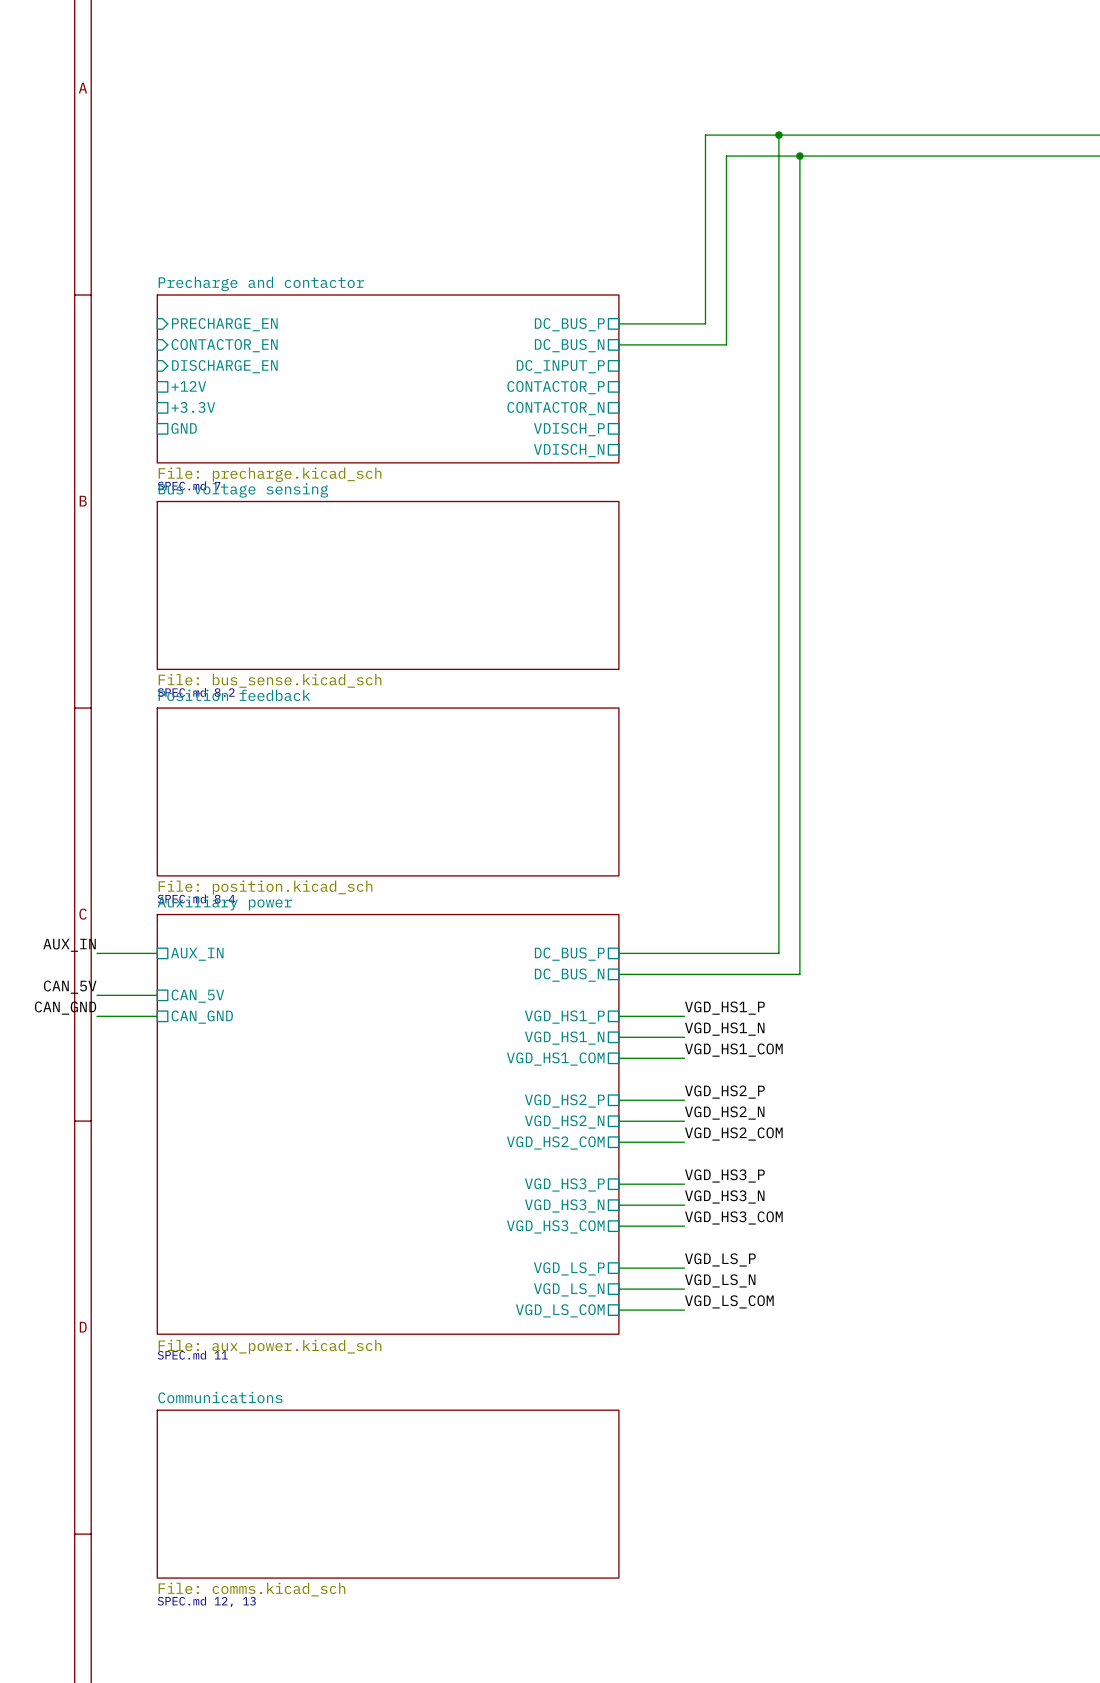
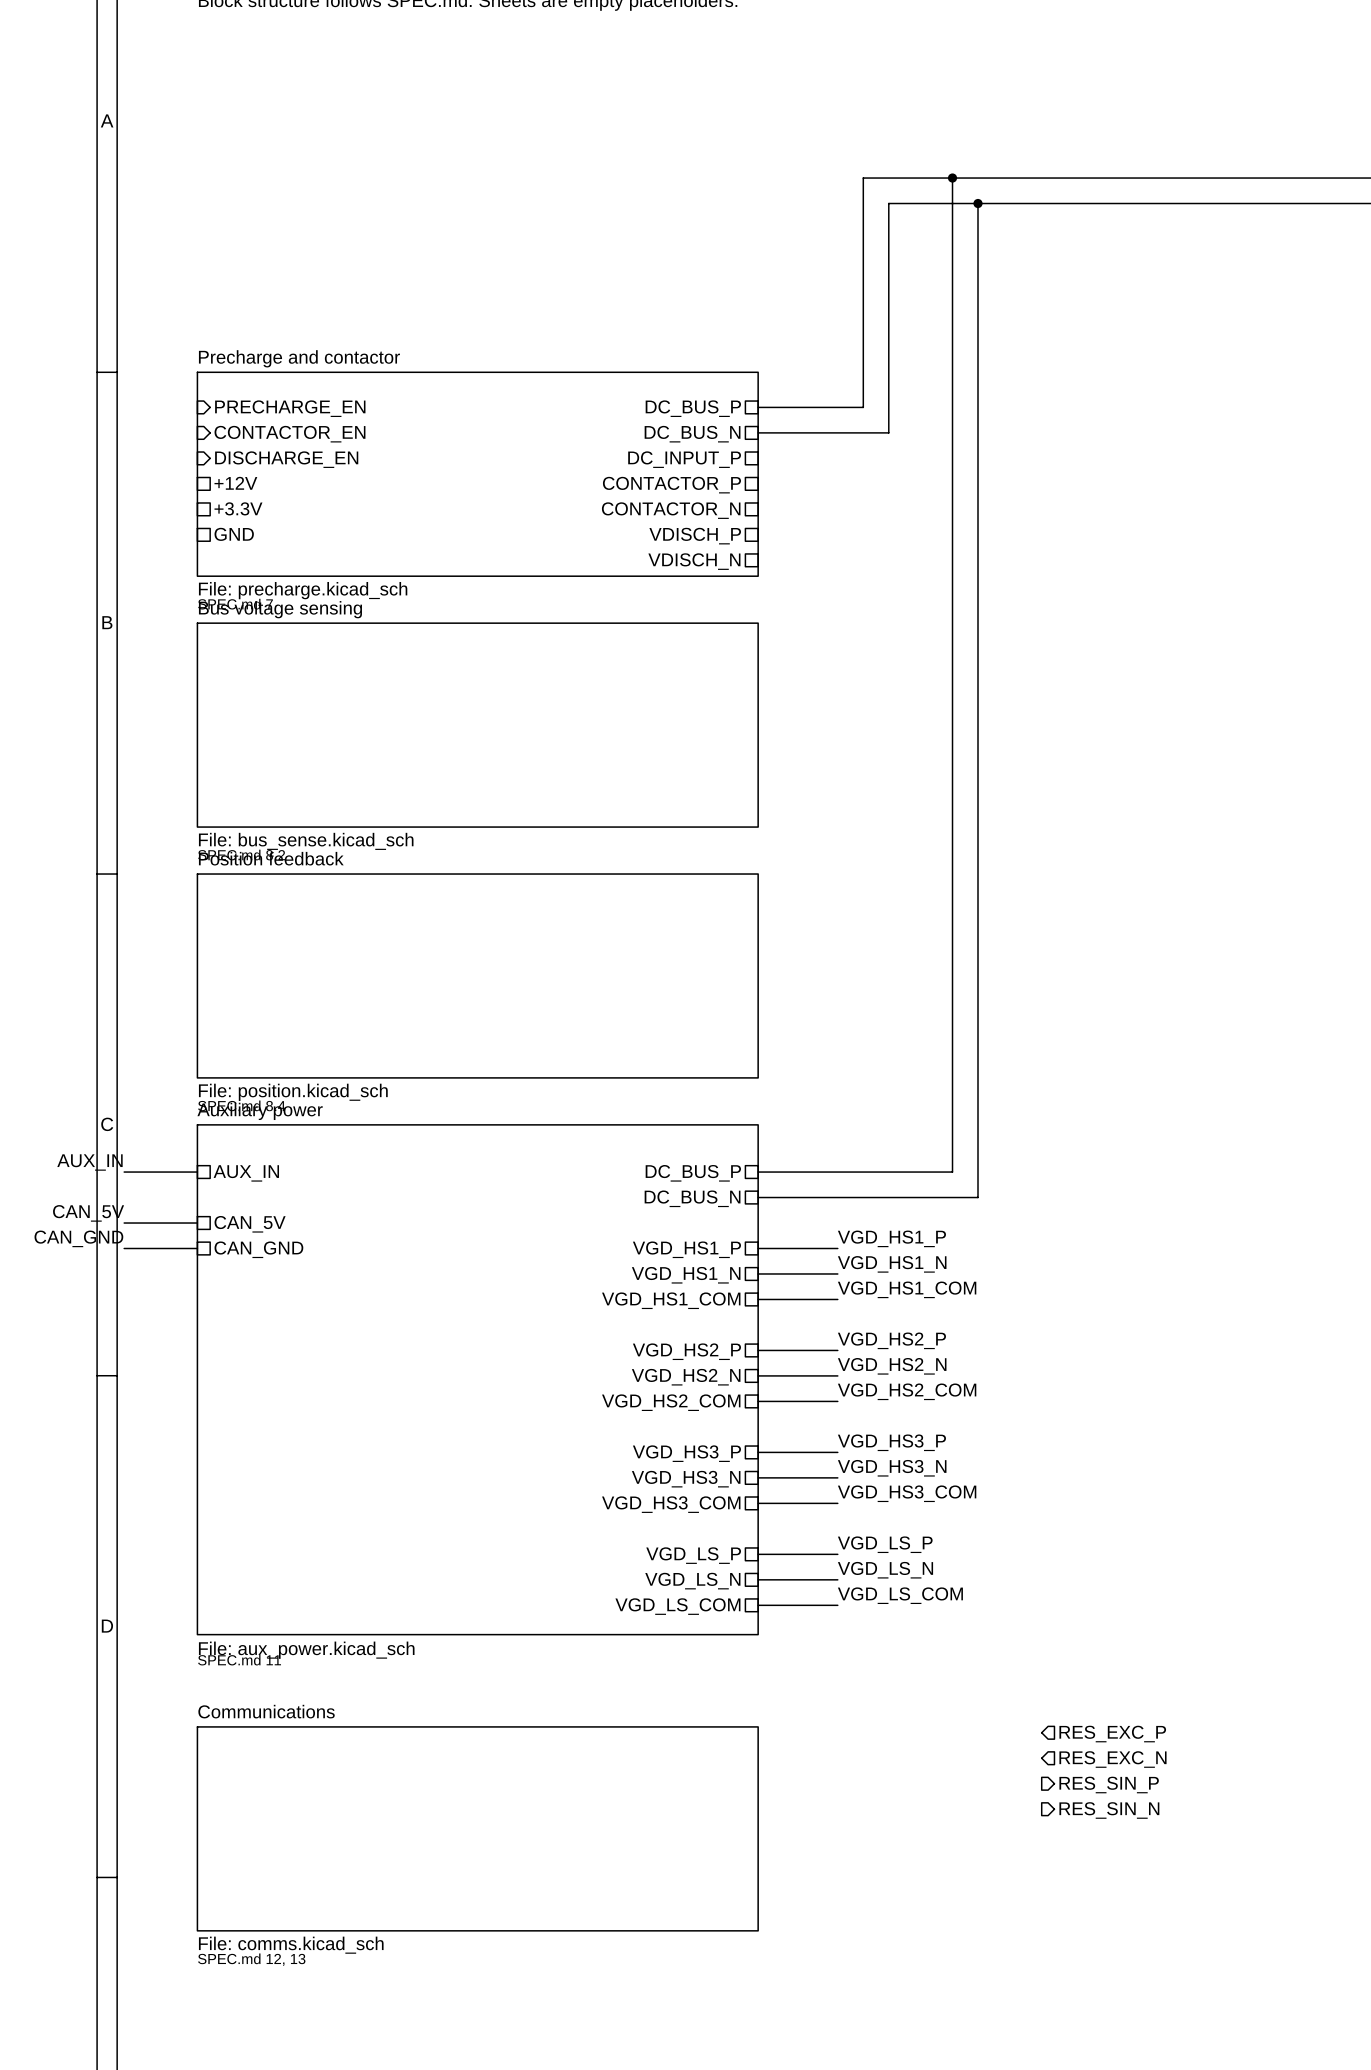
sheet pin: none -> RES_EXC_P (1112, 1734)
sheet pin: none -> RES_EXC_N (1112, 1759)
sheet pin: none -> RES_SIN_P (1109, 1785)
sheet pin: none -> RES_SIN_N (1109, 1810)

